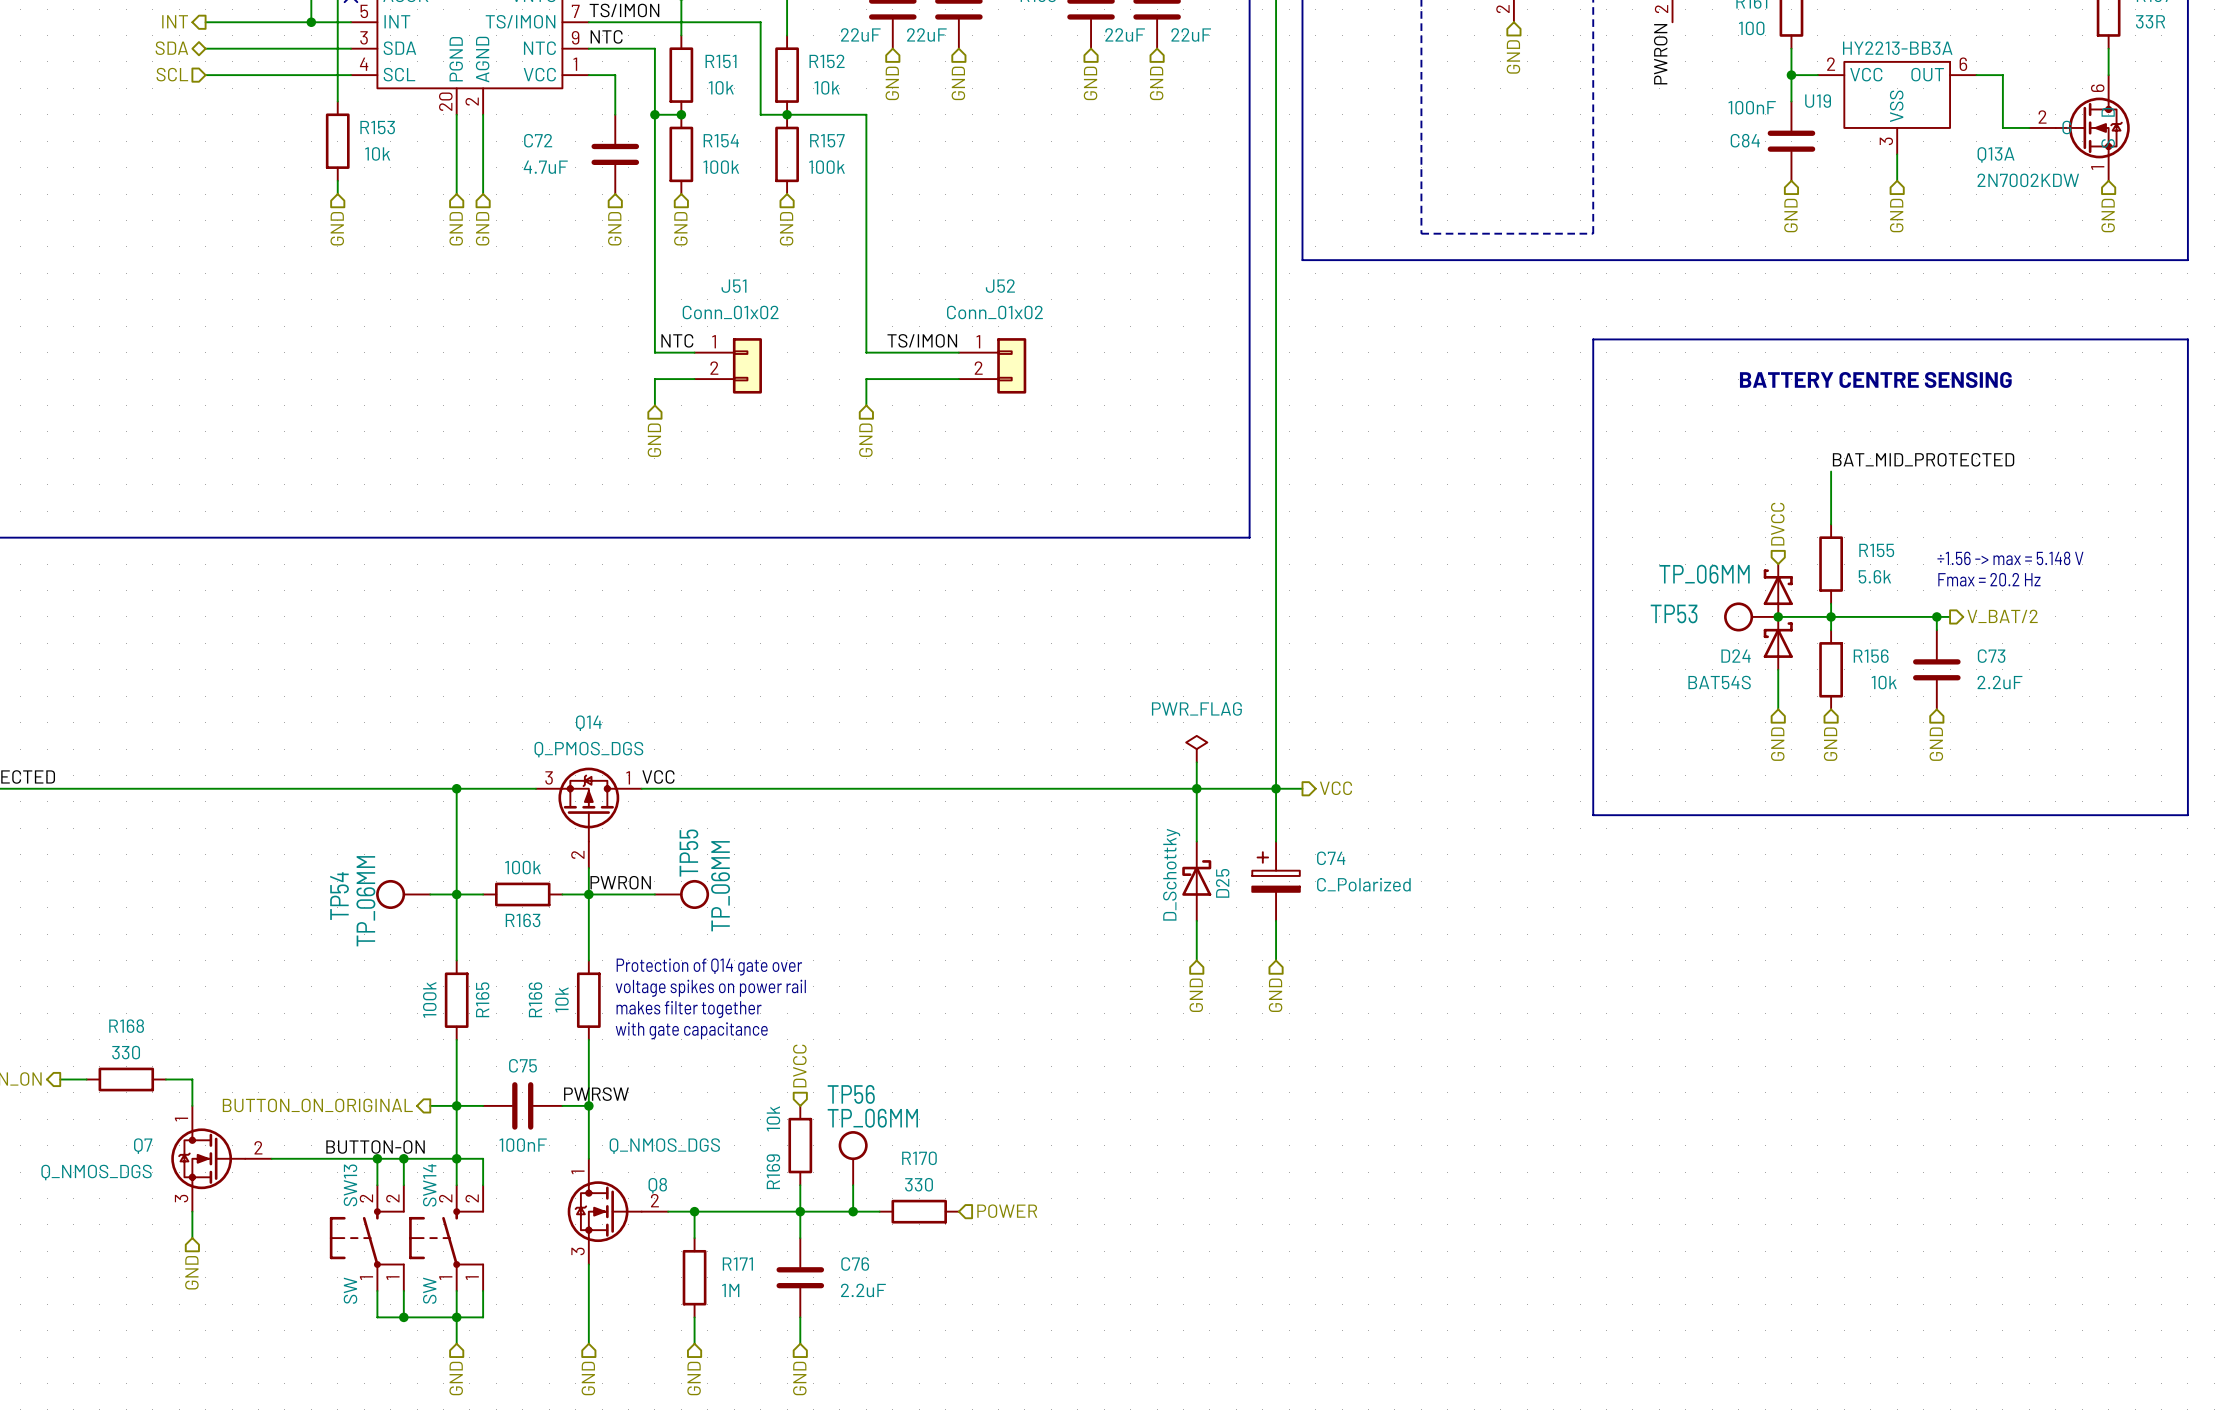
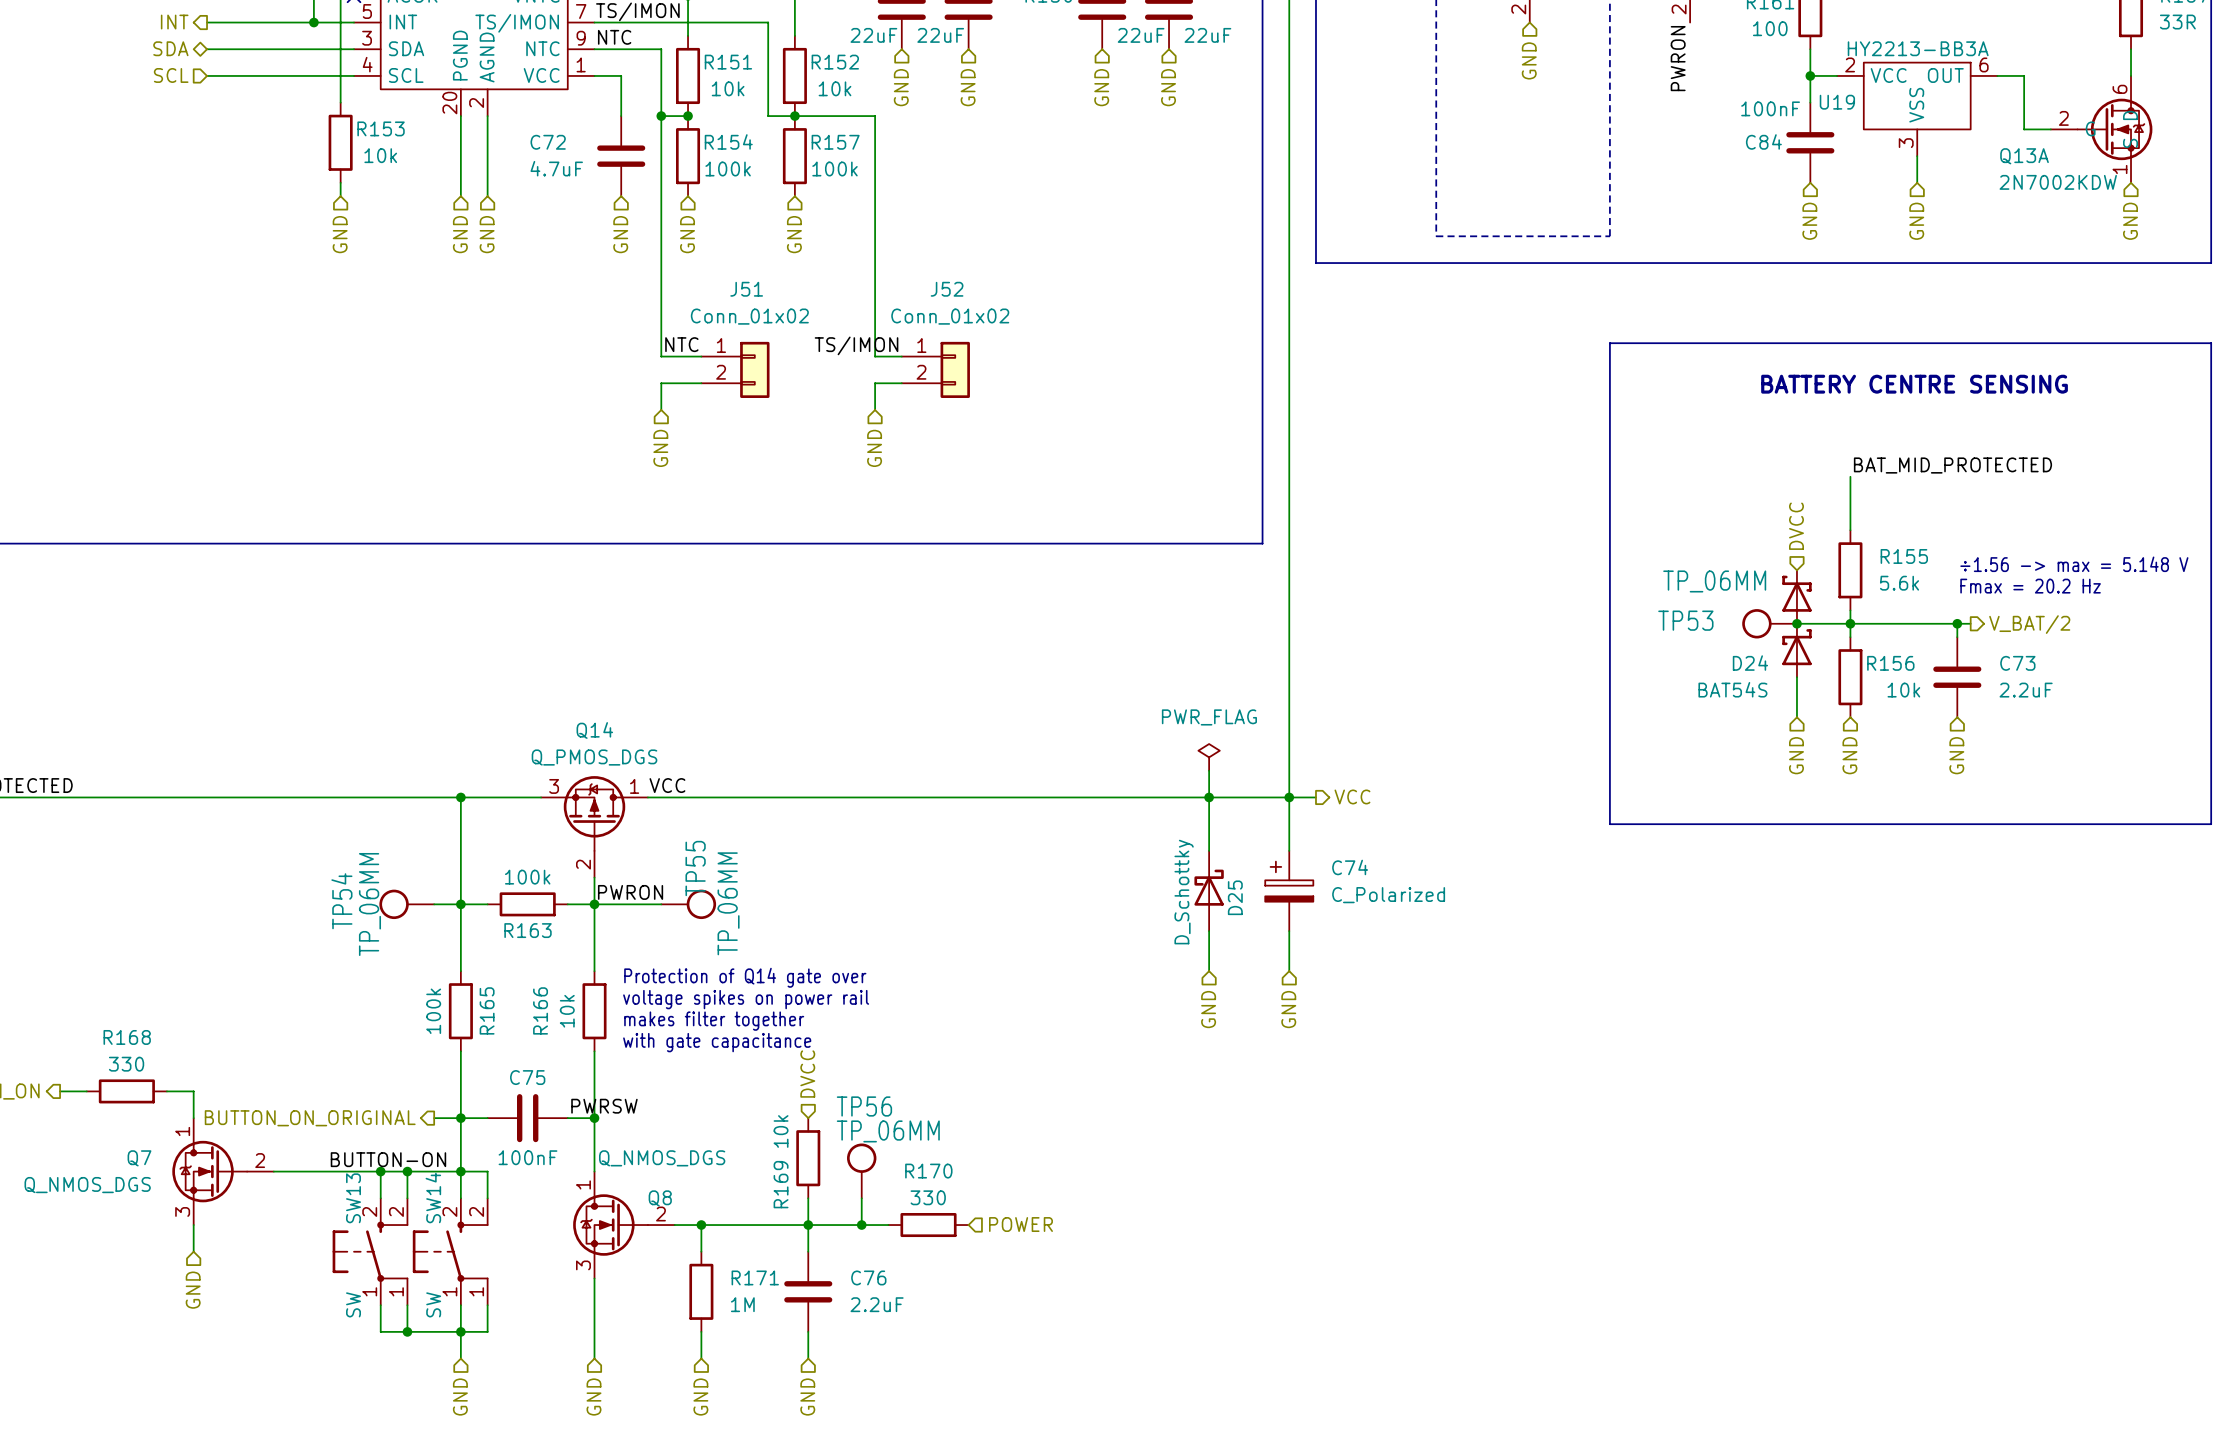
label position: TS/IMON (922, 340) -> TS/IMON (856, 345)
J52 position: (992, 365) -> (935, 369)

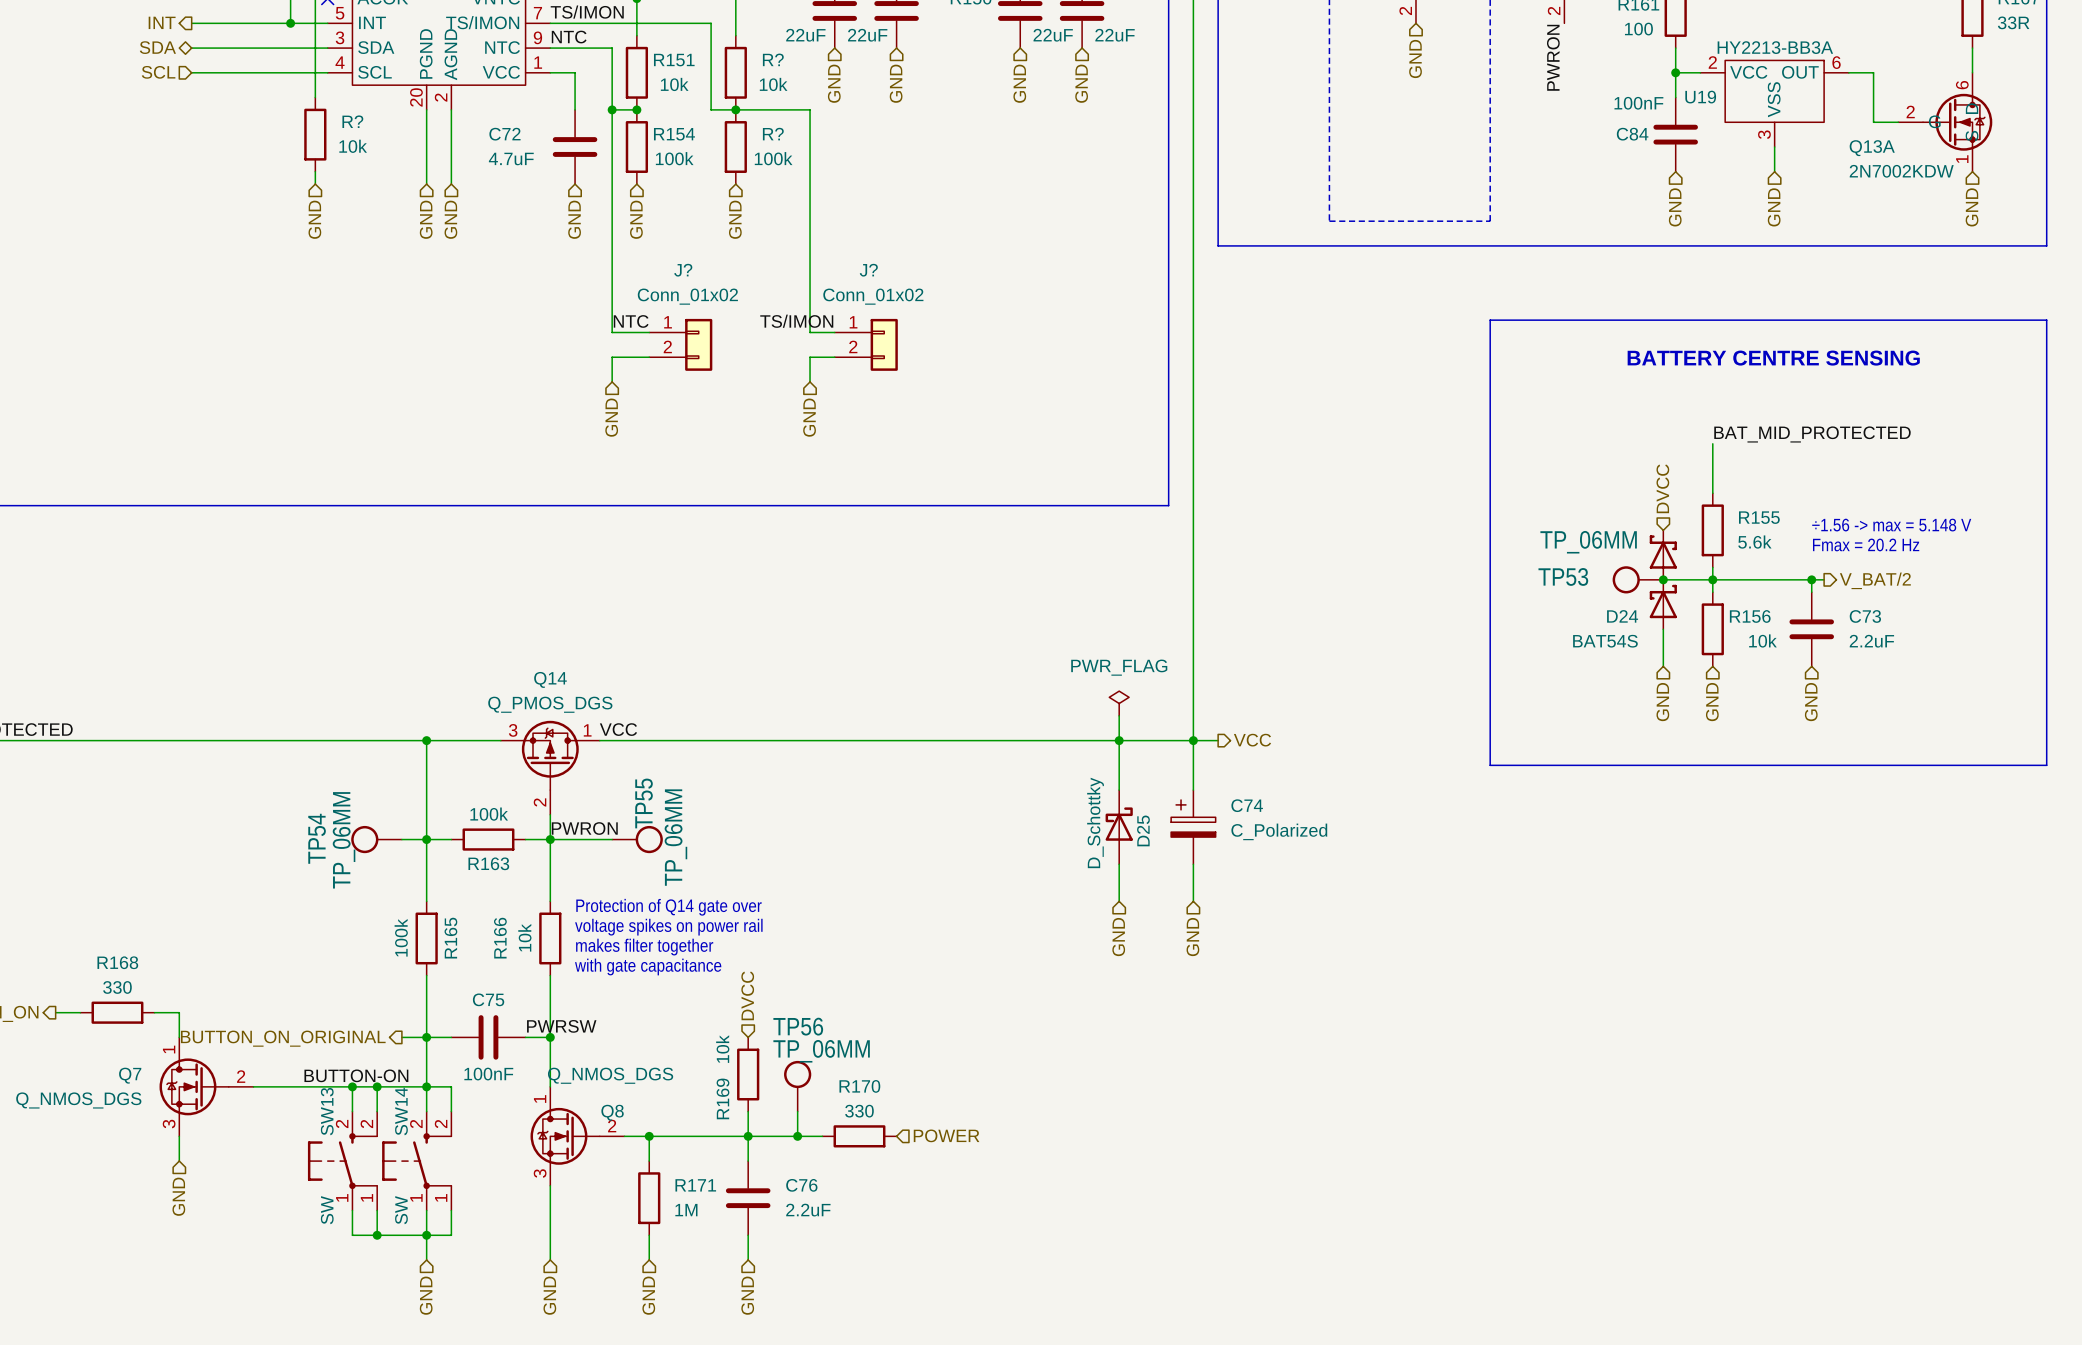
R152 name: R152 (835, 62) -> R? (773, 59)
R153 name: R153 (381, 128) -> R? (352, 121)
R157 name: R157 (835, 142) -> R? (773, 134)
J51 name: J51 (746, 289) -> J? (683, 270)
J52 name: J52 (947, 289) -> J? (868, 270)

